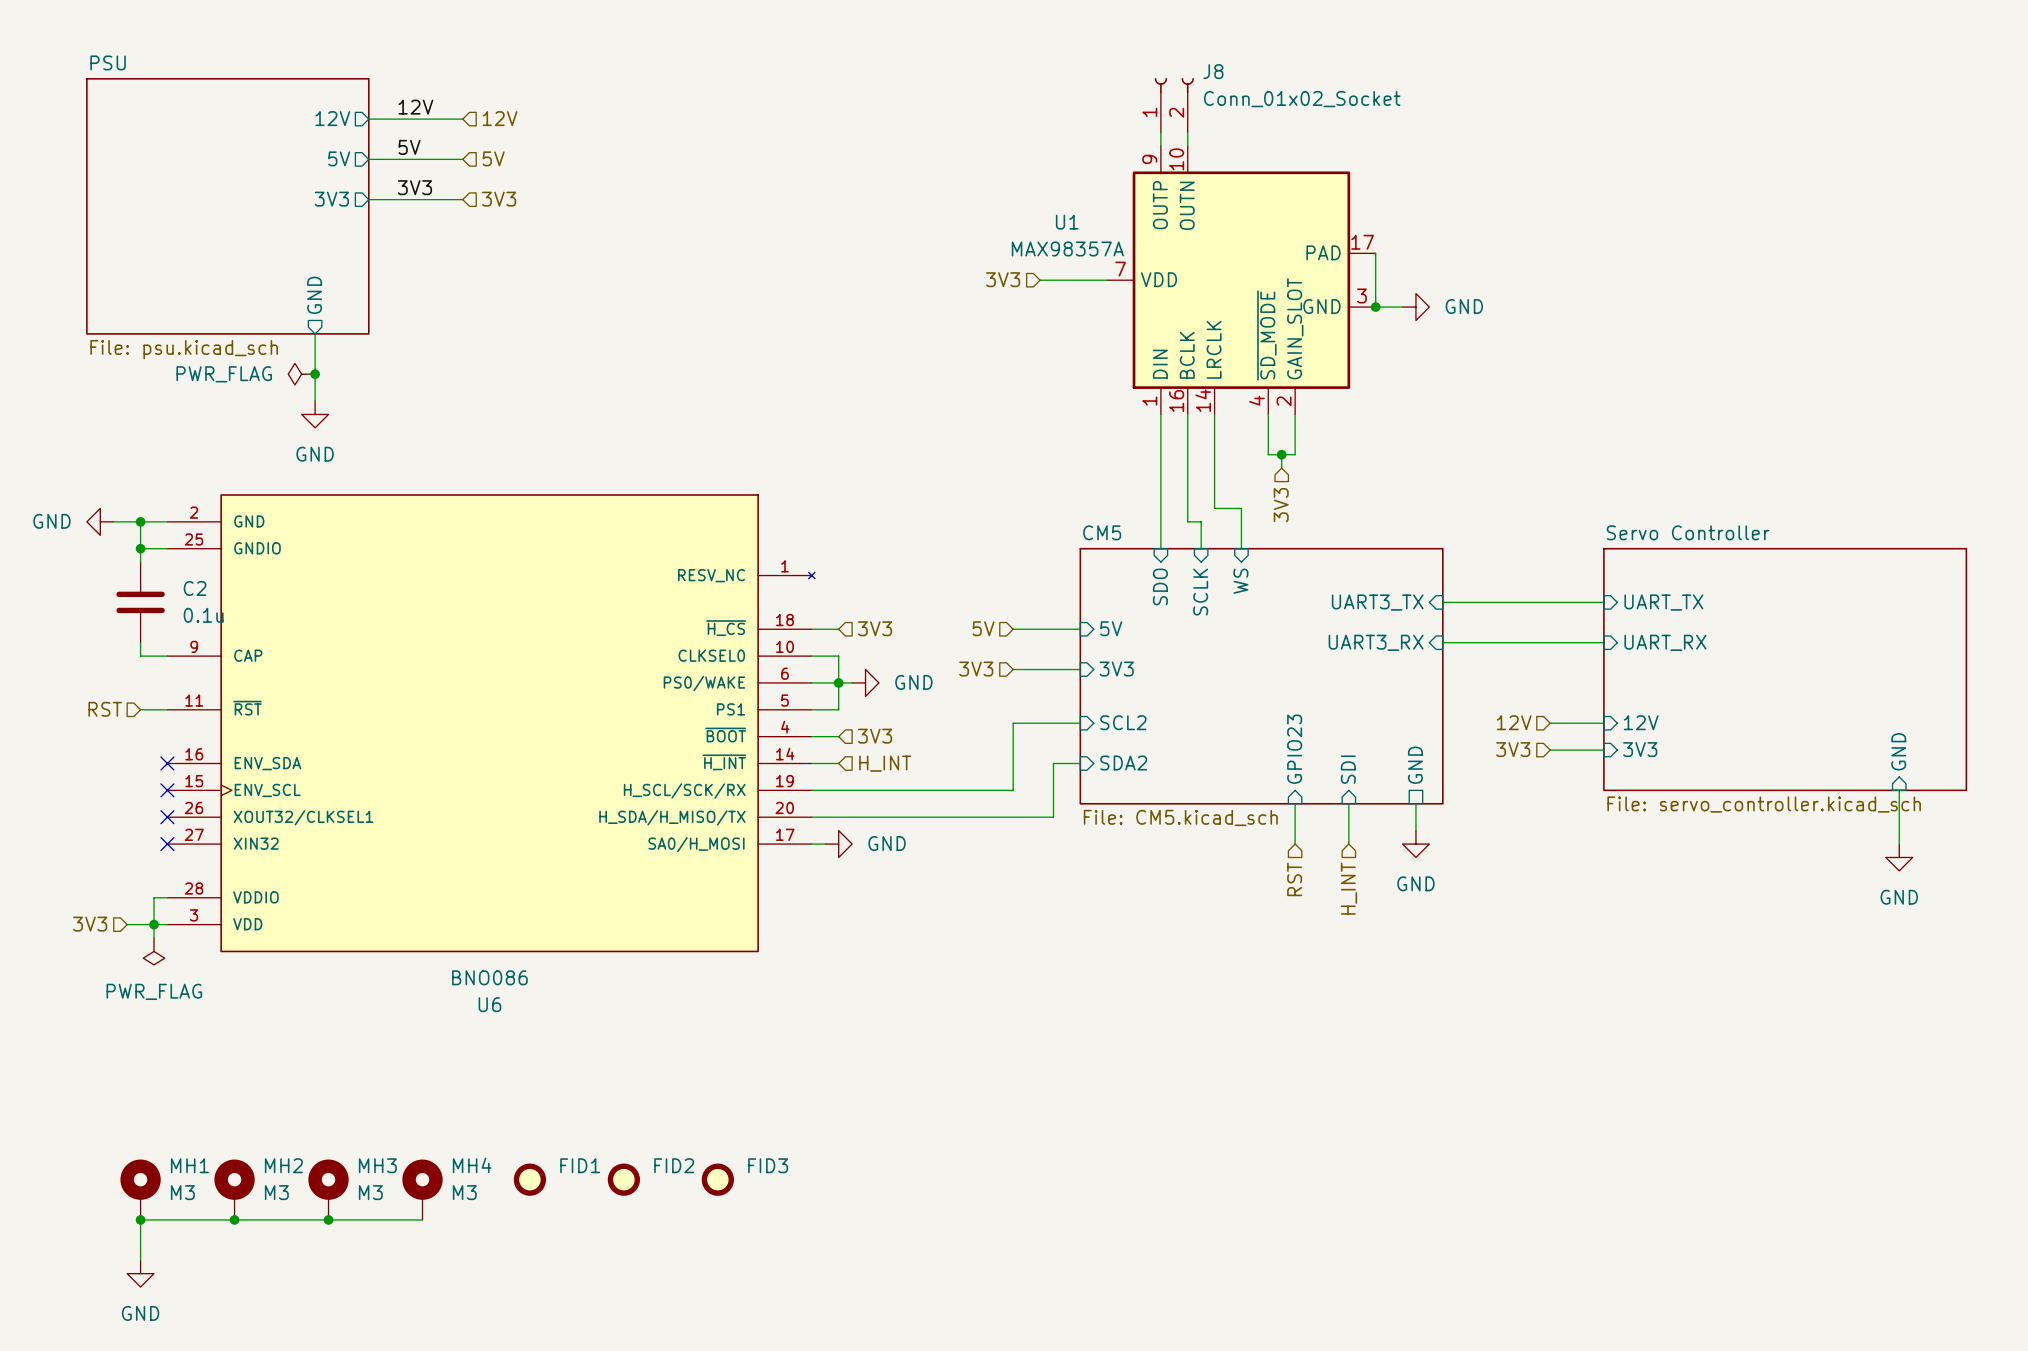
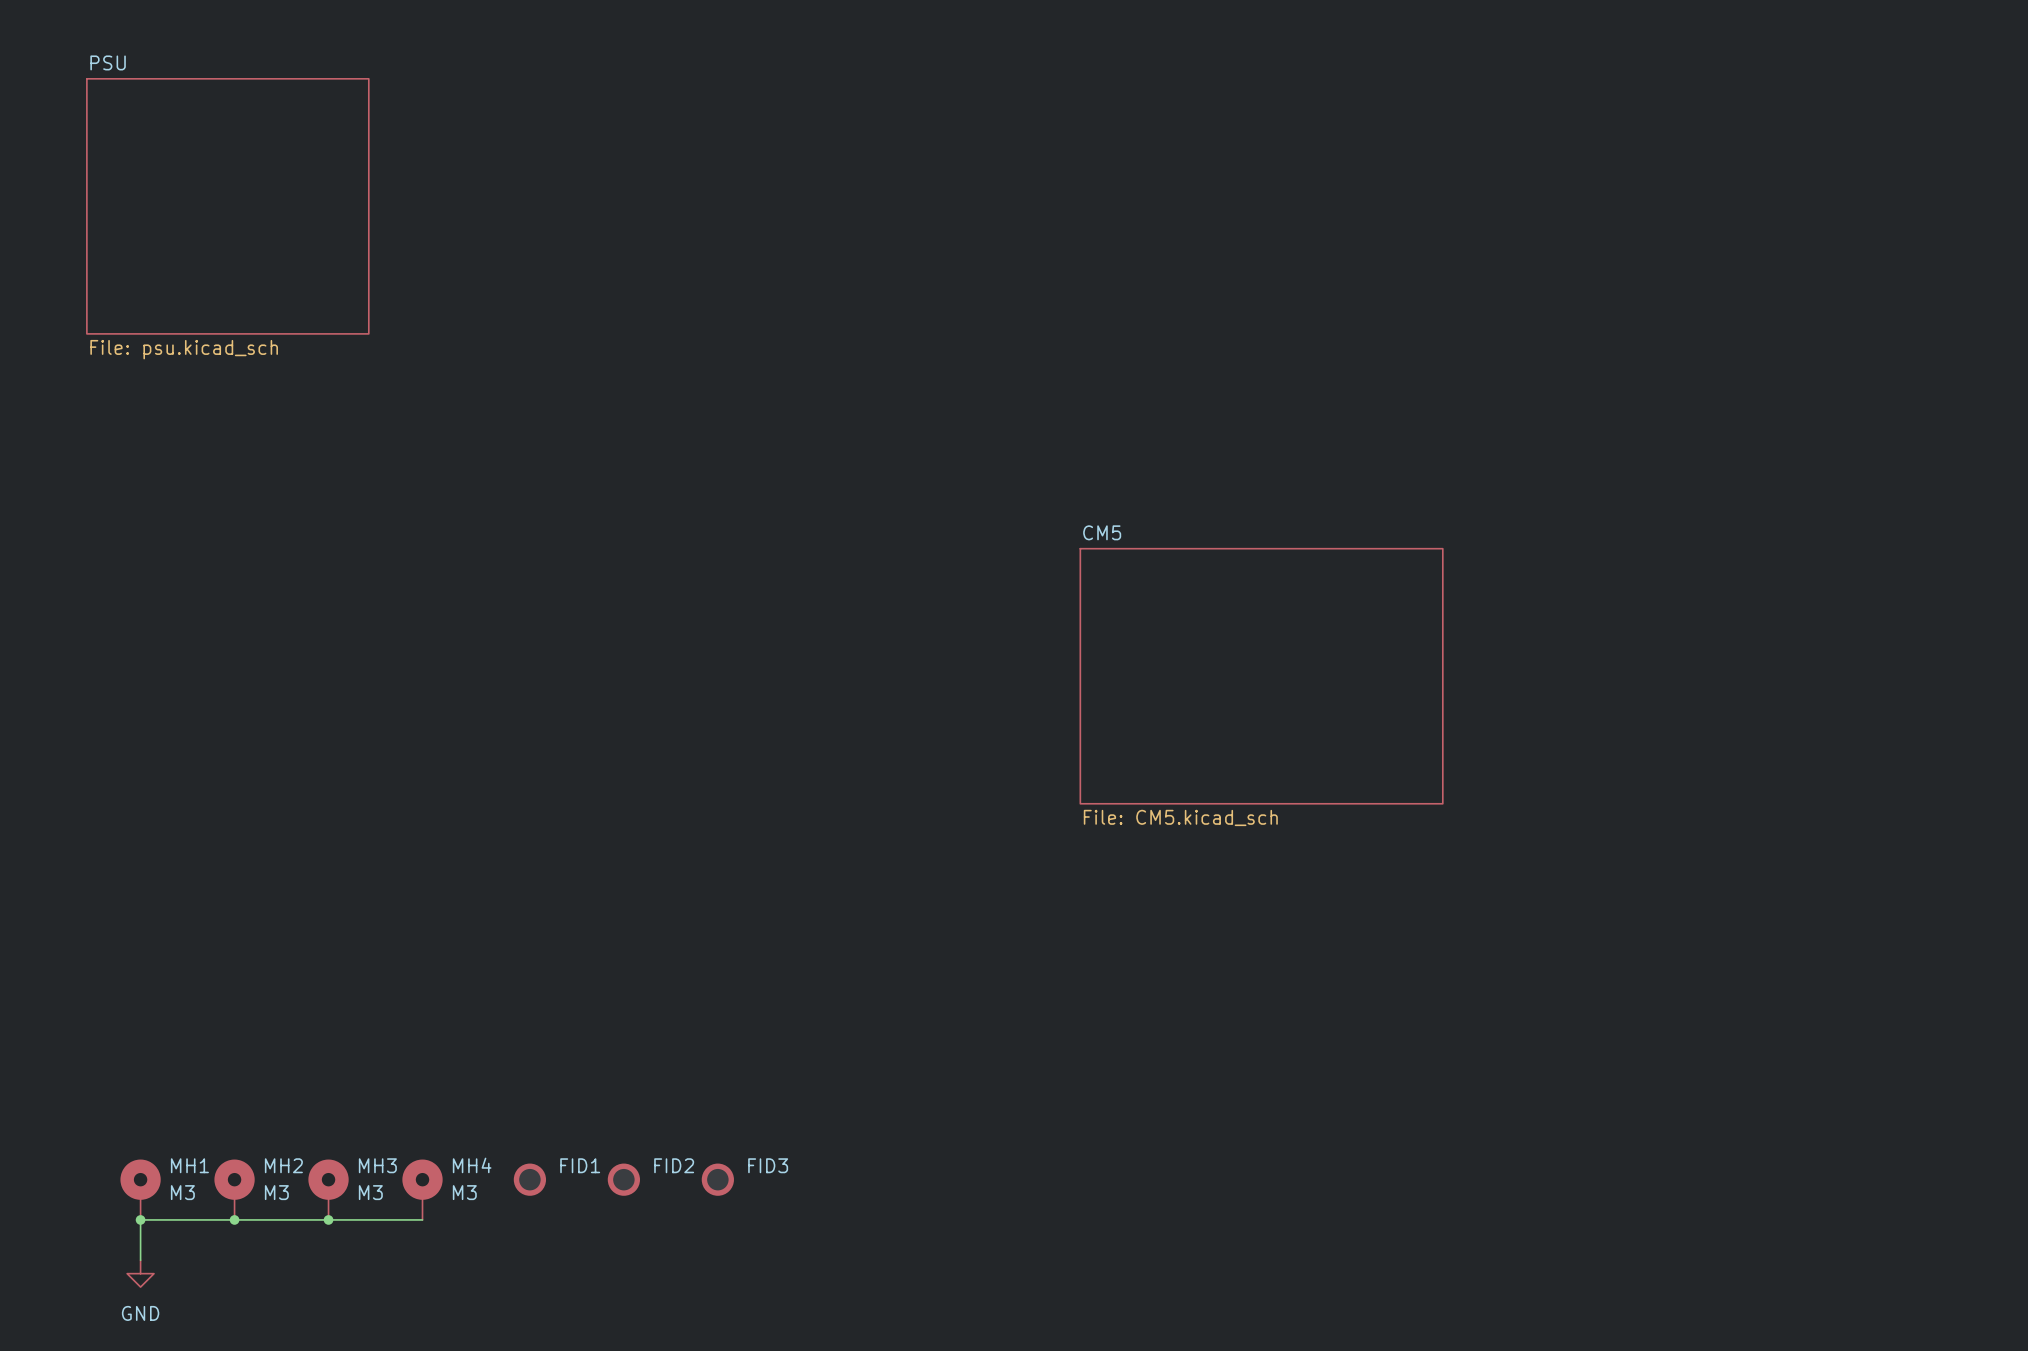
J8: Conn_01x02_Socket (1174, 105) -> none
label: 12V (415, 107) -> none
sheet pin: 12V (332, 118) -> none
hierarchical label: 12V (500, 118) -> none
wire: (368, 119) (462, 119) -> none
wire: (1160, 132) (1160, 145) -> none
wire: (1187, 132) (1187, 145) -> none
label: 5V (409, 147) -> none
sheet pin: 5V (339, 158) -> none
hierarchical label: 5V (493, 158) -> none
wire: (368, 159) (462, 159) -> none
label: 3V3 (414, 187) -> none
sheet pin: 3V3 (331, 199) -> none
wire: (368, 199) (462, 199) -> none
hierarchical label: 3V3 (499, 199) -> none
wire: (1375, 253) (1375, 307) (1402, 307) -> none
hierarchical label: 3V3 (1003, 279) -> none
wire: (1040, 280) (1107, 280) -> none
U1: MAX98357A (1241, 280) -> none
sheet pin: GND (314, 295) -> none
junction: (1375, 307) -> none
power symbol: GND (1415, 307) -> none
wire: (315, 333) (315, 401) -> none
power symbol: PWR_FLAG (301, 374) -> none
junction: (315, 374) -> none
power symbol: GND (315, 414) -> none
wire: (1160, 414) (1160, 548) -> none
wire: (1187, 414) (1187, 521) (1201, 521) (1201, 548) -> none
wire: (1214, 414) (1214, 508) (1241, 508) (1241, 548) -> none
wire: (1268, 414) (1268, 454) (1295, 454) (1295, 414) -> none
wire: (1281, 454) (1281, 468) -> none
junction: (1281, 454) -> none
hierarchical label: 3V3 (1281, 505) -> none
power symbol: GND (100, 521) -> none
wire: (113, 521) (167, 521) -> none
wire: (140, 521) (140, 562) -> none
junction: (140, 521) -> none
wire: (140, 548) (167, 548) -> none
junction: (140, 548) -> none
sheet pin: WS (1240, 581) -> none
sheet pin: SDO (1160, 586) -> none
sheet pin: SCLK (1200, 592) -> none
C2: 0.1u (140, 602) -> none
sheet pin: UART3_TX (1377, 602) -> none
wire: (1442, 602) (1603, 602) -> none
sheet pin: UART_TX (1663, 602) -> none
hierarchical label: 3V3 (875, 628) -> none
hierarchical label: 5V (983, 628) -> none
sheet pin: 5V (1111, 628) -> none
wire: (811, 629) (838, 629) -> none
wire: (1013, 629) (1080, 629) -> none
wire: (140, 642) (140, 656) (167, 656) -> none
sheet pin: UART3_RX (1376, 642) -> none
wire: (1442, 642) (1603, 642) -> none
sheet pin: UART_RX (1665, 642) -> none
wire: (811, 656) (838, 656) (838, 709) (811, 709) -> none
hierarchical label: 3V3 (976, 669) -> none
wire: (1013, 669) (1080, 669) -> none
sheet pin: 3V3 (1116, 669) -> none
sheet Servo Controller: File: servo_controller.kicad_sch (1785, 669) -> none
wire: (811, 682) (852, 682) -> none
junction: (838, 682) -> none
power symbol: GND (865, 682) -> none
hierarchical label: RST (105, 709) -> none
wire: (140, 709) (167, 709) -> none
sheet pin: SCL2 (1123, 722) -> none
hierarchical label: 12V (1514, 722) -> none
sheet pin: 12V (1641, 722) -> none
U6: BNO086 (491, 723) -> none
wire: (1080, 723) (1013, 723) (1013, 790) (811, 790) -> none
wire: (1550, 723) (1603, 723) -> none
wire: (811, 736) (838, 736) -> none
hierarchical label: 3V3 (875, 736) -> none
sheet pin: GPIO23 (1294, 749) -> none
hierarchical label: 3V3 (1513, 749) -> none
sheet pin: 3V3 (1640, 749) -> none
wire: (1550, 750) (1603, 750) -> none
sheet pin: GND (1898, 751) -> none
no-connect mark: (167, 763) -> none
wire: (811, 763) (838, 763) -> none
hierarchical label: H_INT (885, 763) -> none
wire: (1080, 763) (1053, 763) (1053, 817) (811, 817) -> none
sheet pin: SDA2 (1123, 763) -> none
sheet pin: GND (1415, 765) -> none
sheet pin: SDI (1348, 769) -> none
no-connect mark: (167, 790) -> none
wire: (1899, 790) (1899, 844) -> none
wire: (1295, 803) (1295, 844) -> none
wire: (1348, 803) (1348, 844) -> none
wire: (1415, 803) (1415, 830) -> none
no-connect mark: (167, 817) -> none
no-connect mark: (167, 844) -> none
wire: (811, 844) (825, 844) -> none
power symbol: GND (838, 844) -> none
power symbol: GND (1415, 844) -> none
power symbol: GND (1899, 857) -> none
hierarchical label: RST (1294, 879) -> none
hierarchical label: H_INT (1348, 888) -> none
wire: (167, 897) (154, 897) (154, 938) -> none
hierarchical label: 3V3 (90, 924) -> none
wire: (127, 924) (167, 924) -> none
junction: (154, 924) -> none
power symbol: PWR_FLAG (154, 951) -> none

